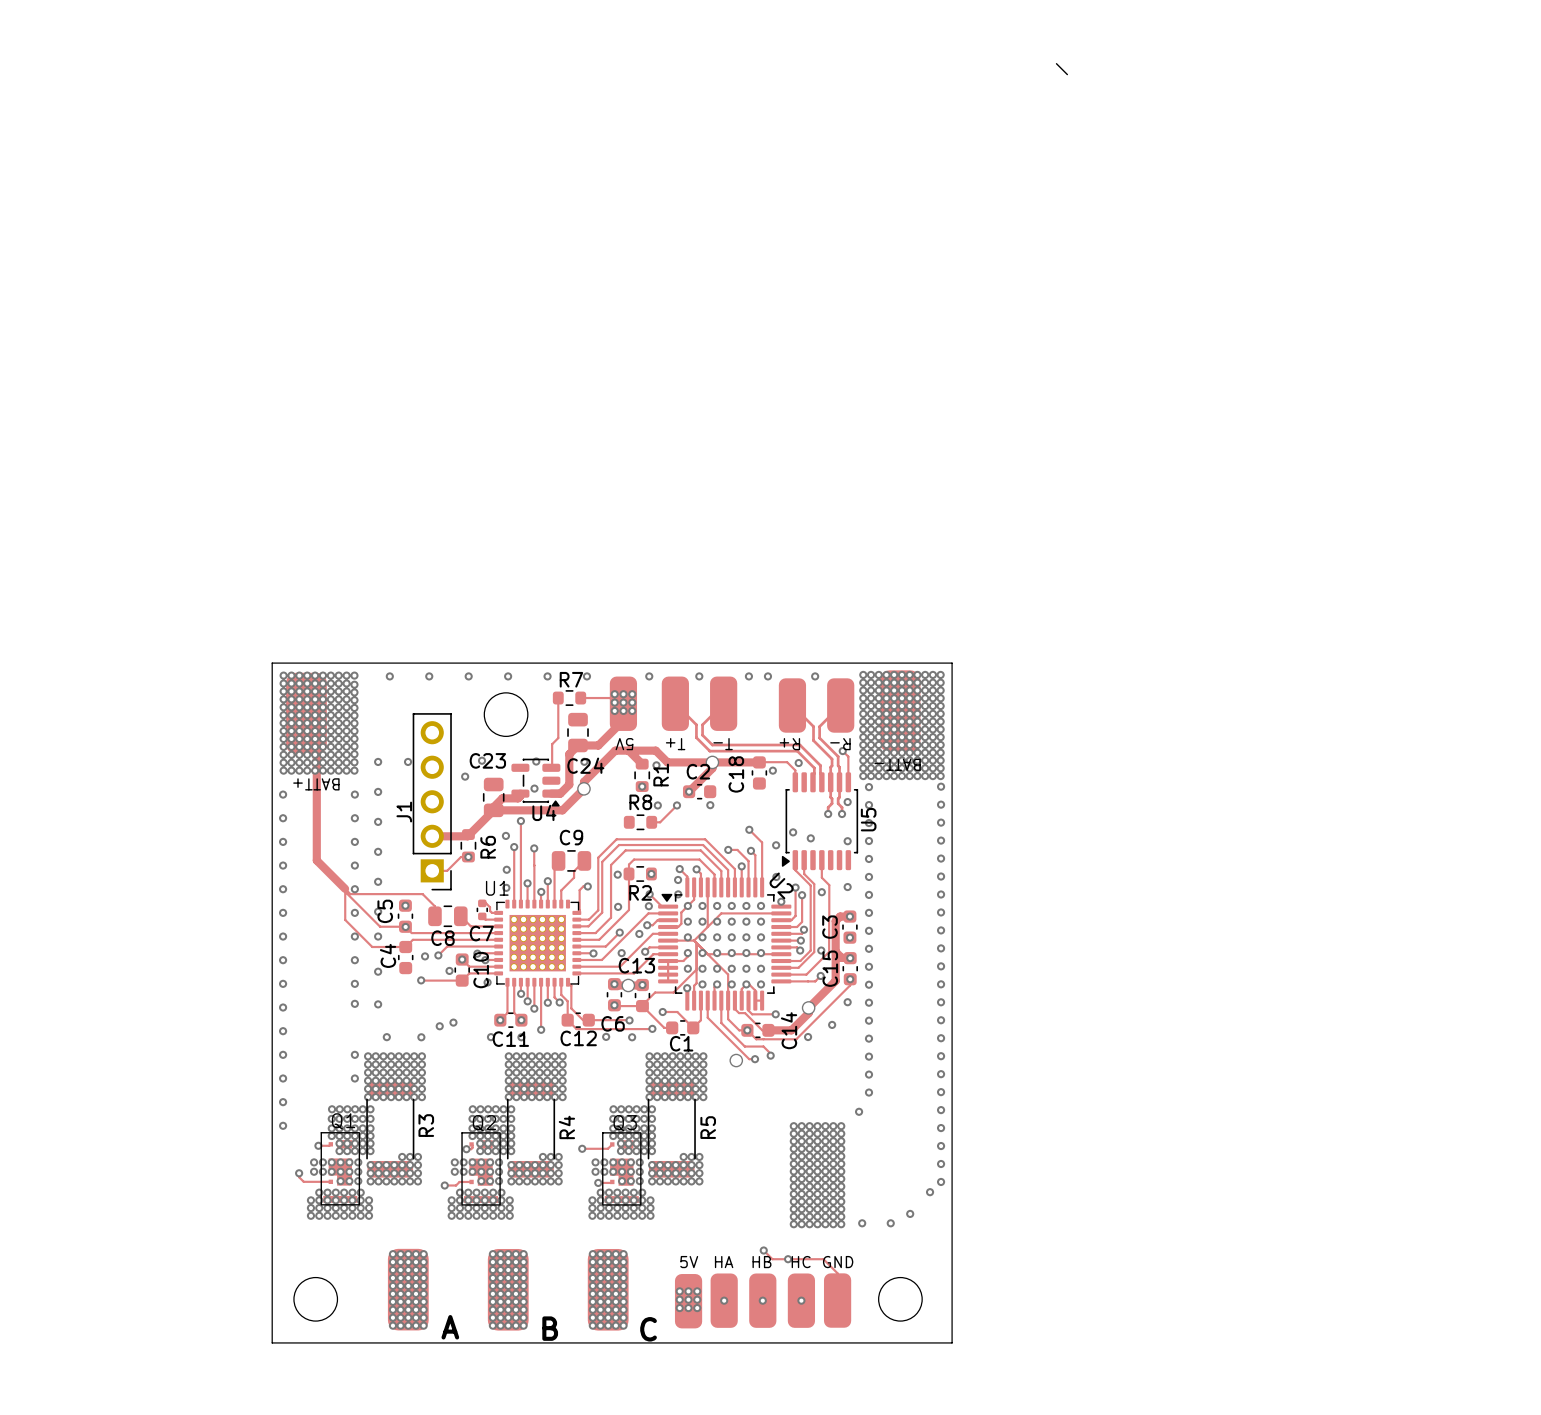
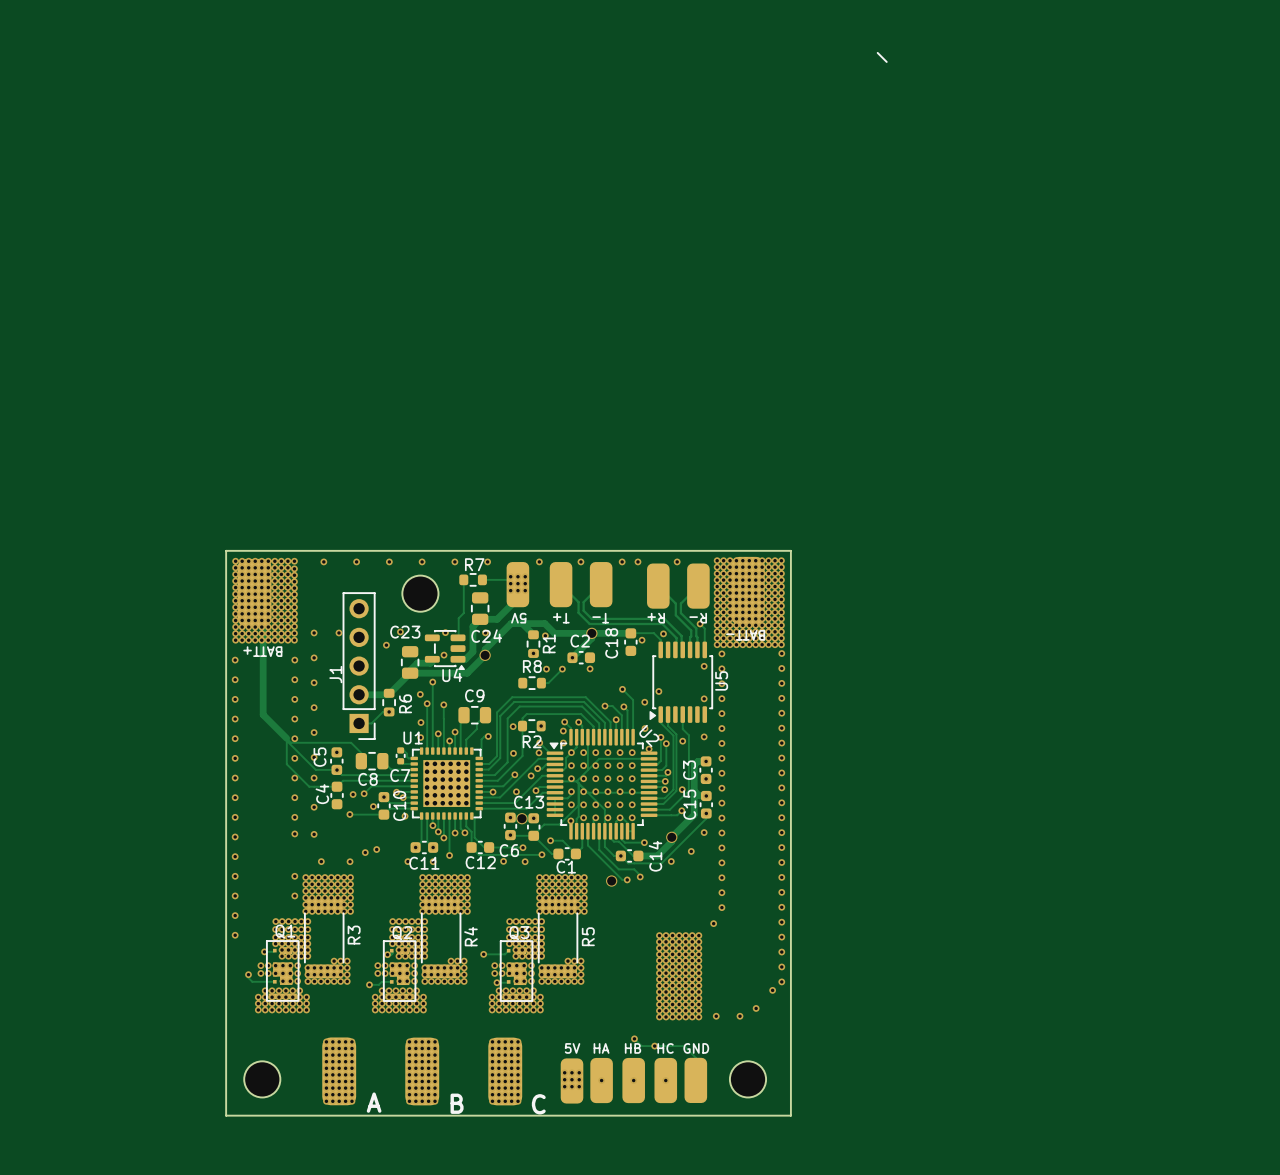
track: (830, 782) (832, 803) (828, 807) (828, 814) -> none
track: (839, 782) (838, 803) (842, 807) (842, 814) -> none
via: (828, 814) -> none
via: (842, 814) -> none
via: (810, 838) -> none

